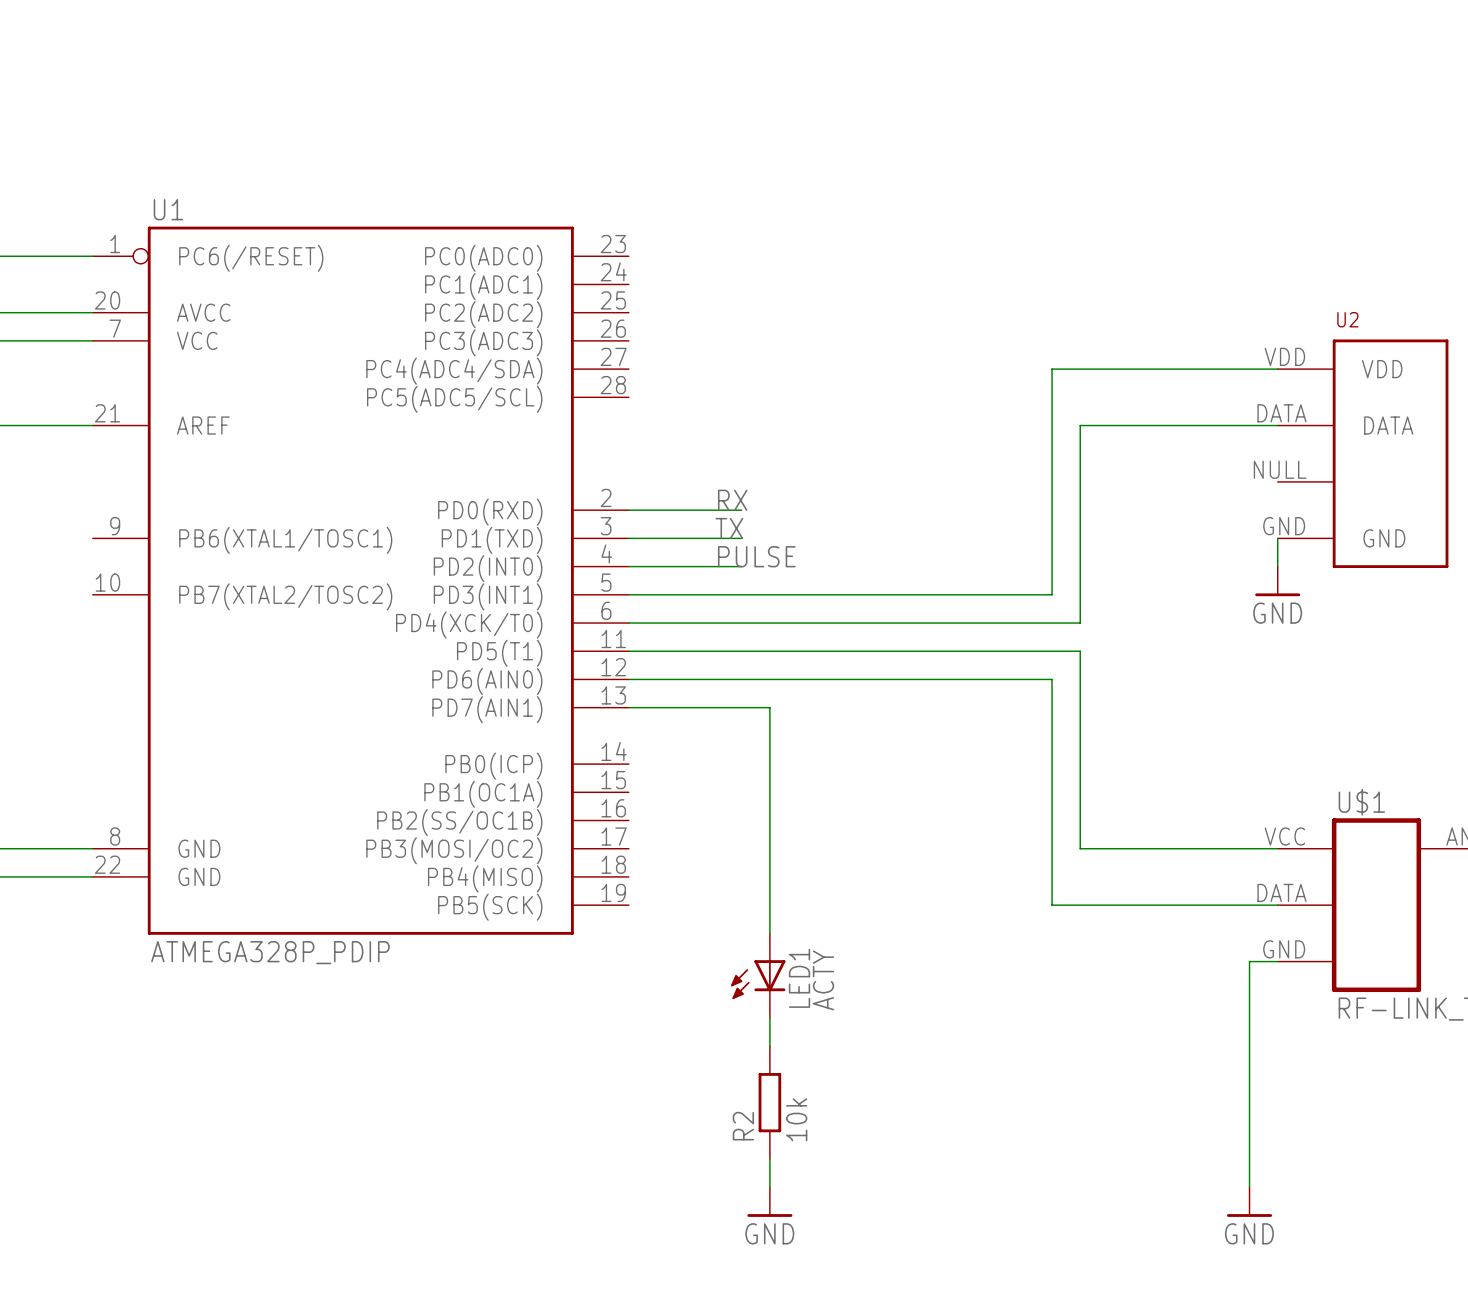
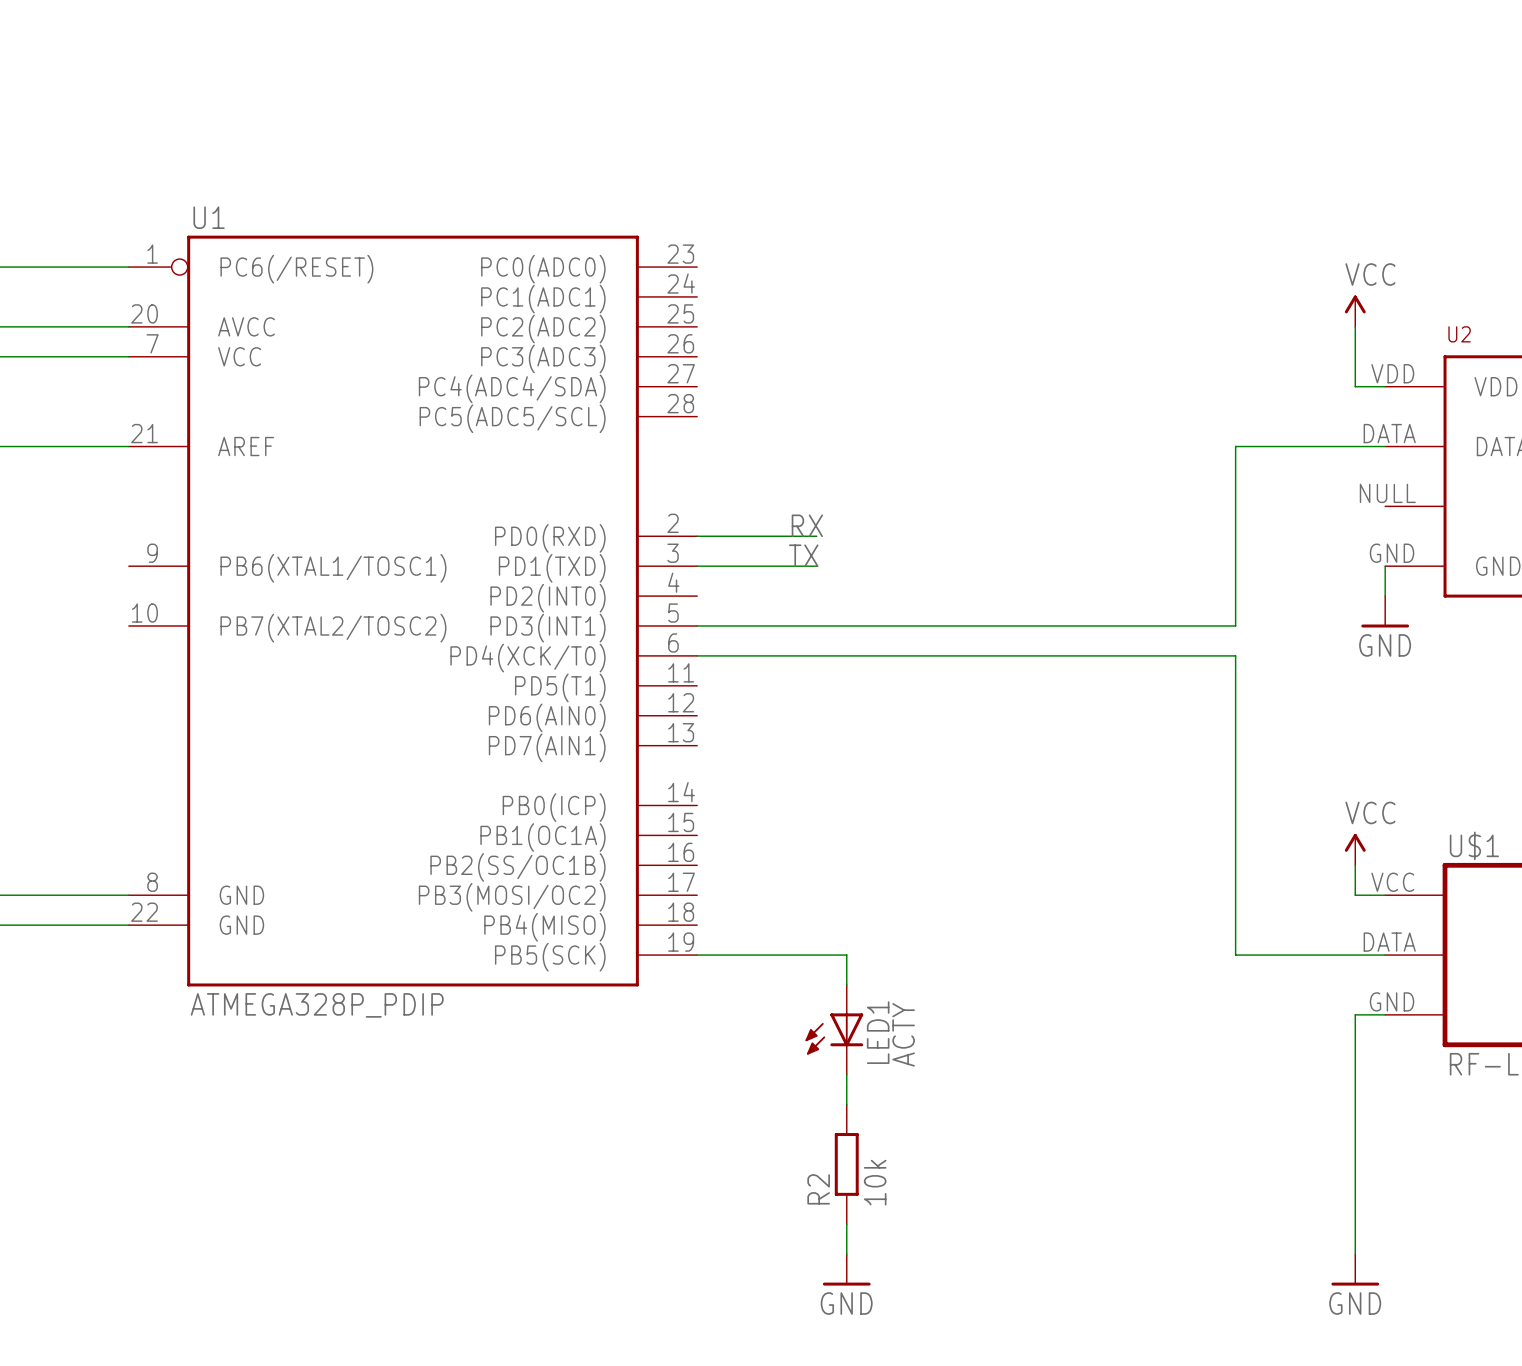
power symbol: none -> VCC (1355, 311)
wire: (1249, 369) (1052, 369) (1052, 594) -> (1355, 386) (1355, 326)
wire: (1136, 425) (1080, 425) (1080, 623) -> (1235, 446) (1235, 626) (1145, 626)
label: PULSE (756, 556) -> none
wire: (628, 566) (741, 566) -> none
wire: (628, 651) (1080, 651) (1080, 848) (1249, 848) -> (1355, 865) (1355, 895)
wire: (628, 679) (1052, 679) (1052, 905) (1136, 905) -> (1175, 655) (1235, 655) (1235, 955)
wire: (628, 707) (769, 707) (769, 905) -> (697, 955) (846, 955)
power symbol: none -> VCC (1355, 849)

